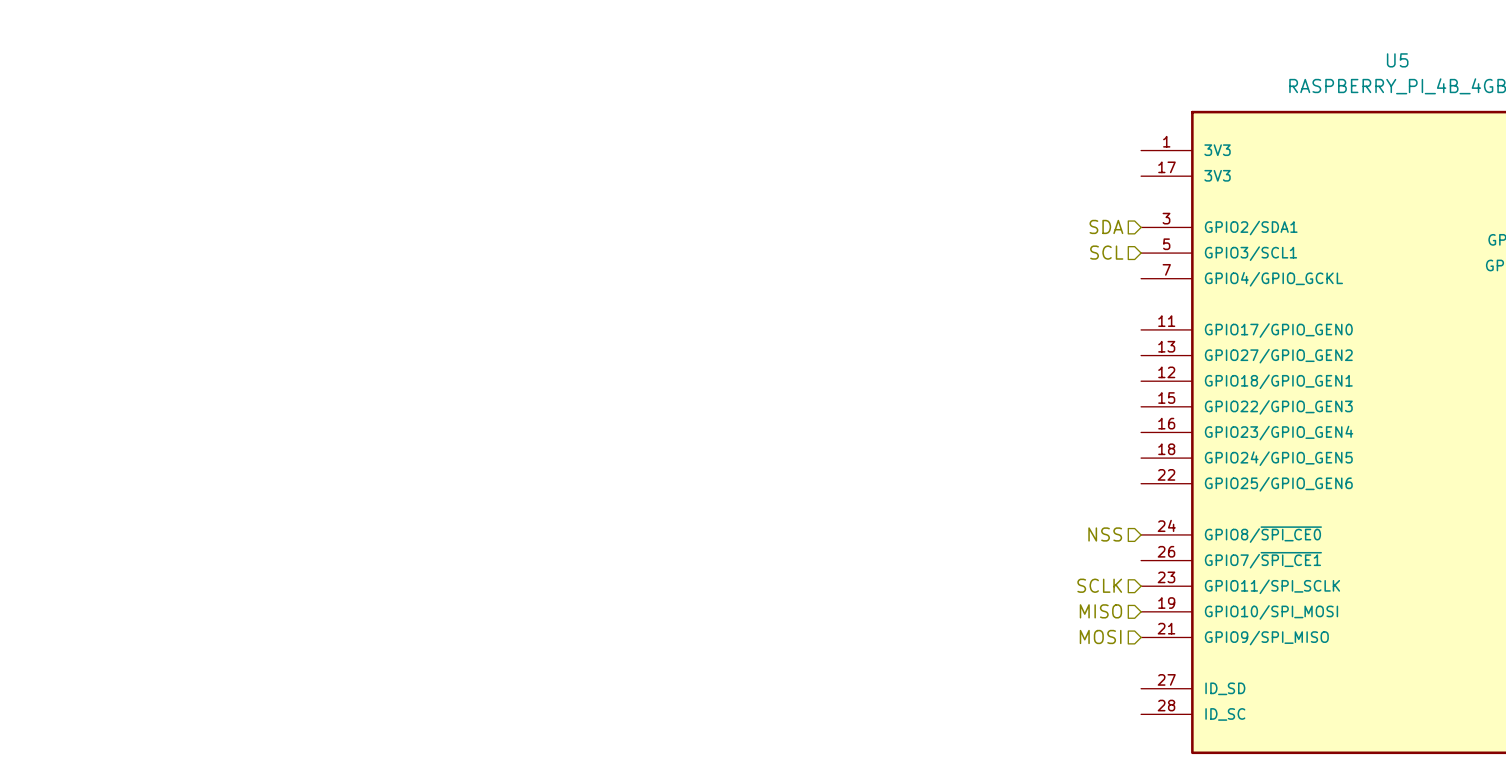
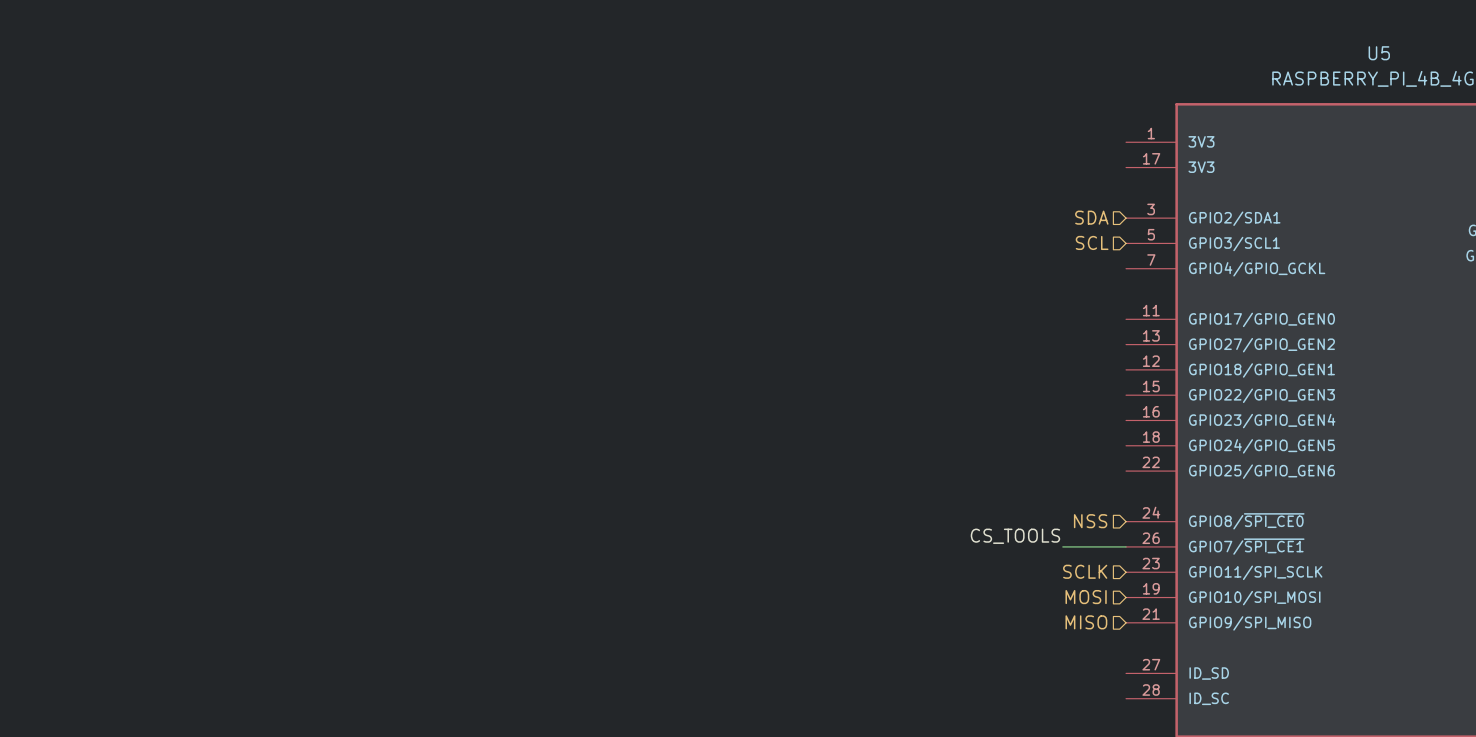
label: none -> CS_TOOLS (1015, 536)
wire: none -> (1062, 546) (1126, 546)
hierarchical label: MISO (1100, 611) -> MOSI (1086, 597)
hierarchical label: MOSI (1100, 636) -> MISO (1086, 622)

